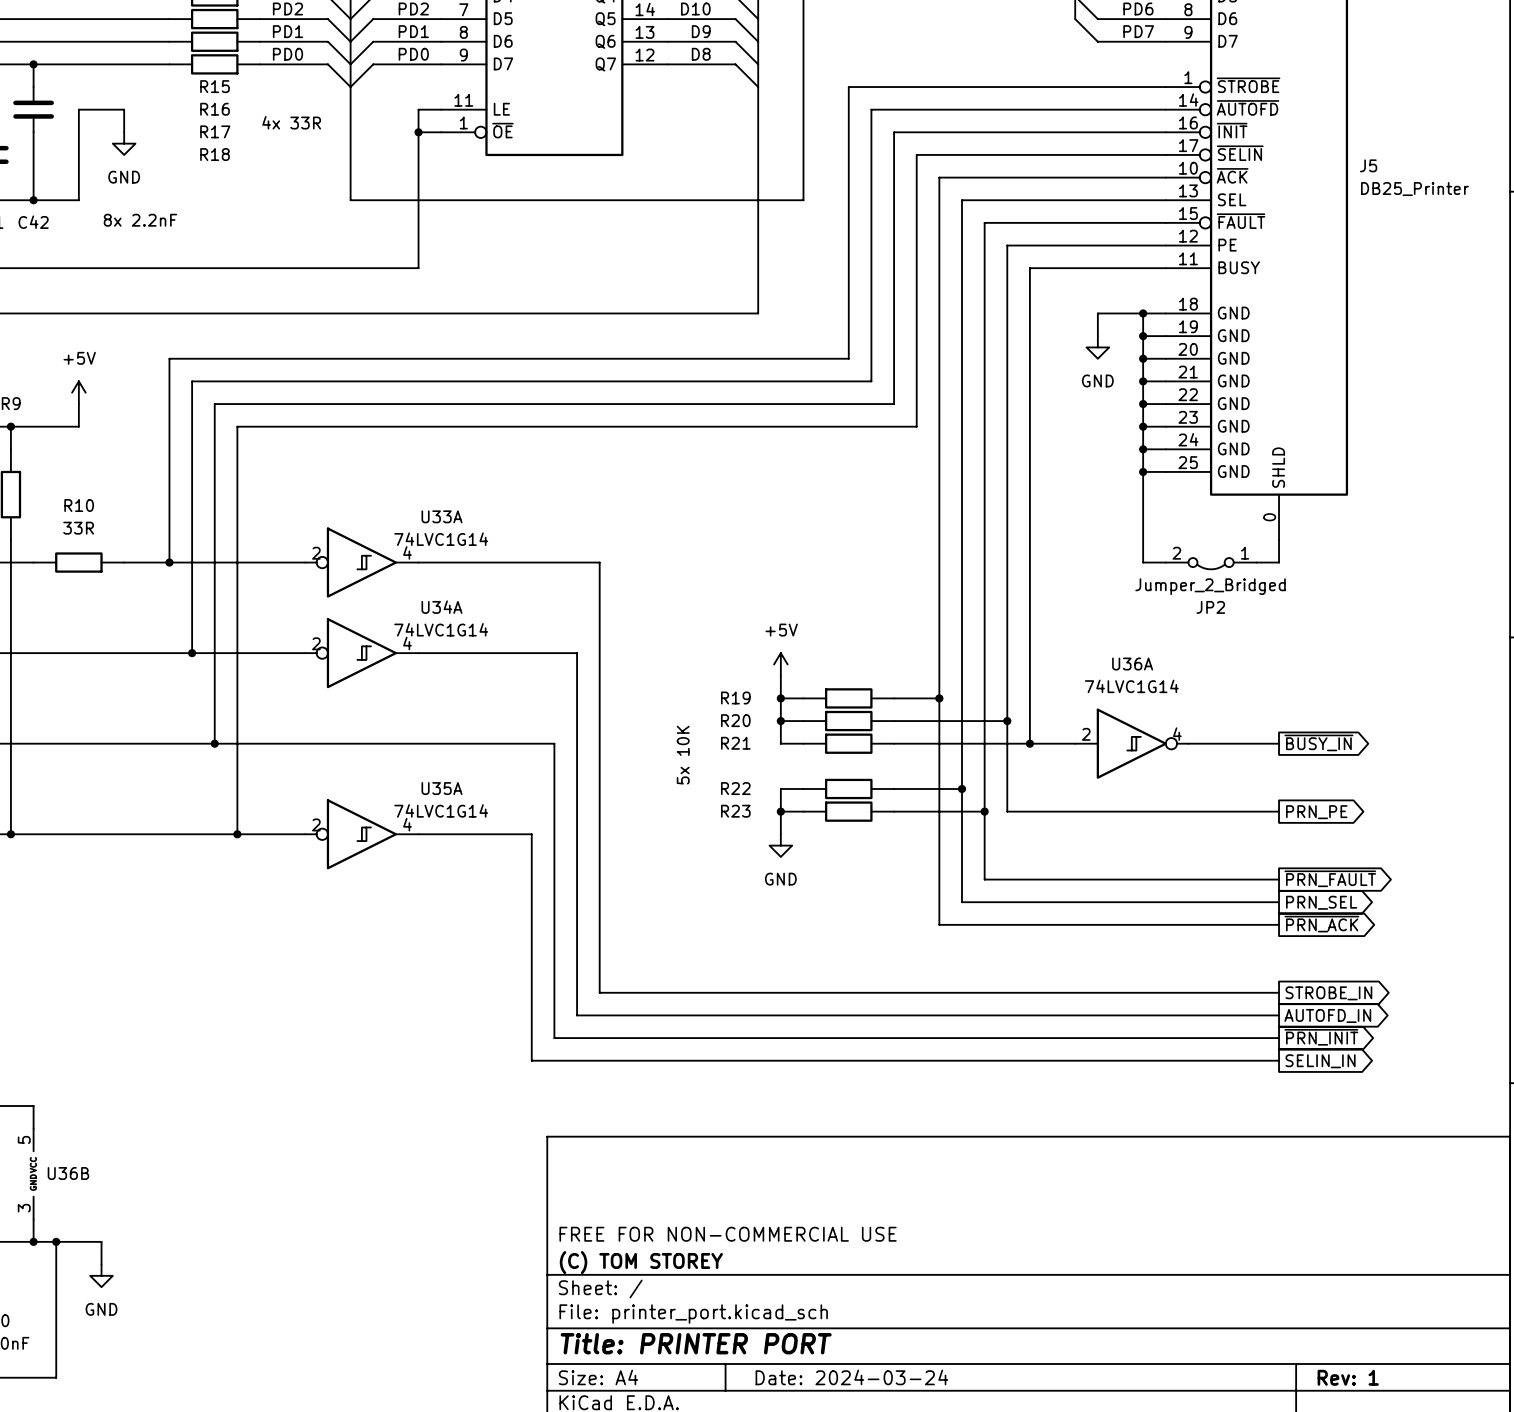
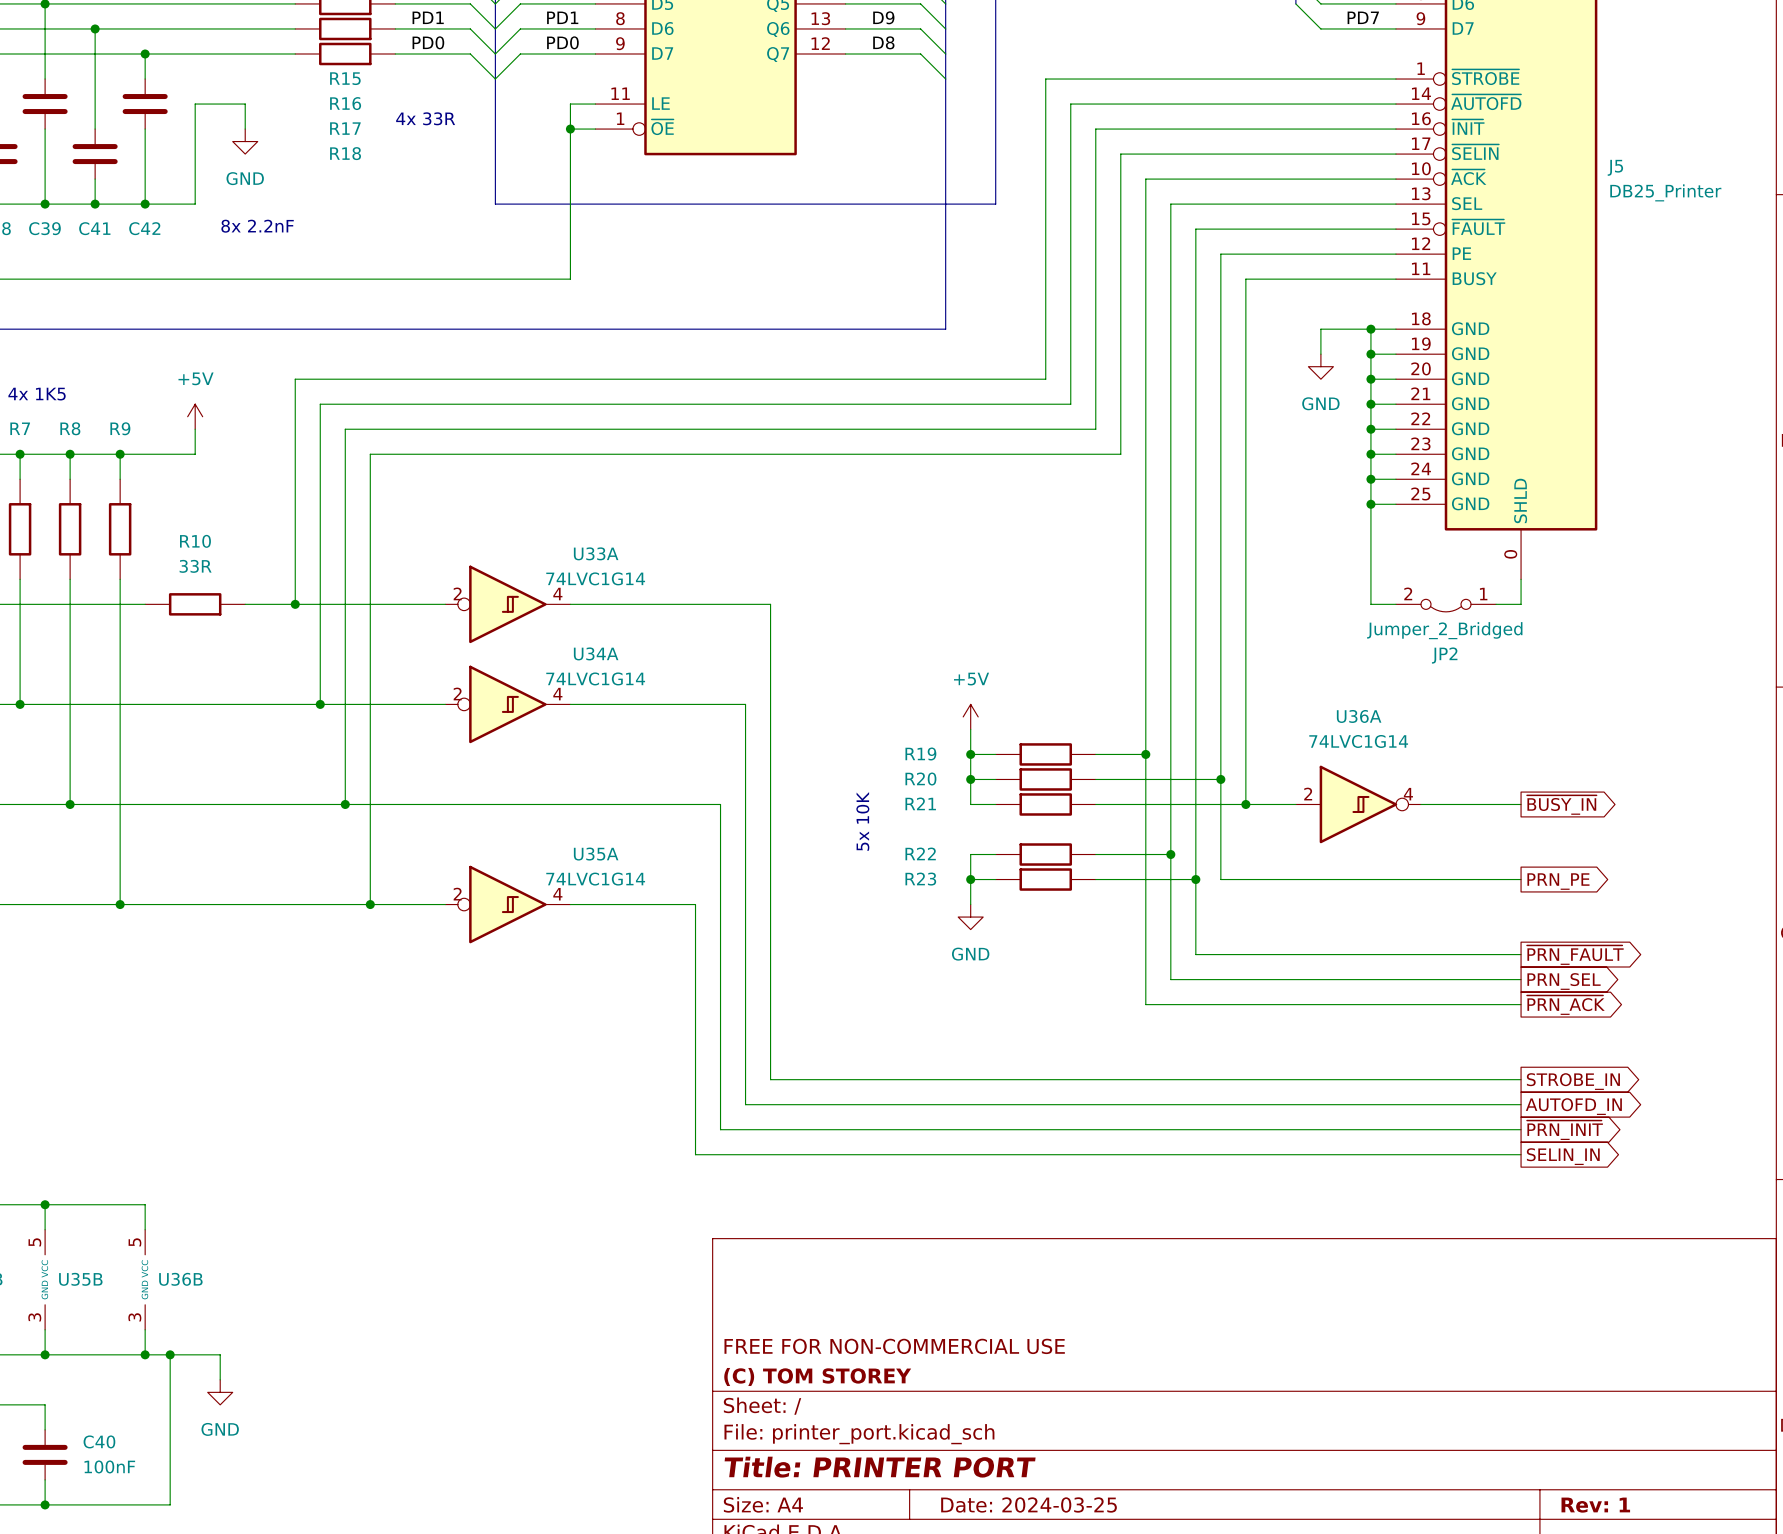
title block: Date: 2024-03-24 (851, 1377) -> Date: 2024-03-25 (1029, 1504)

